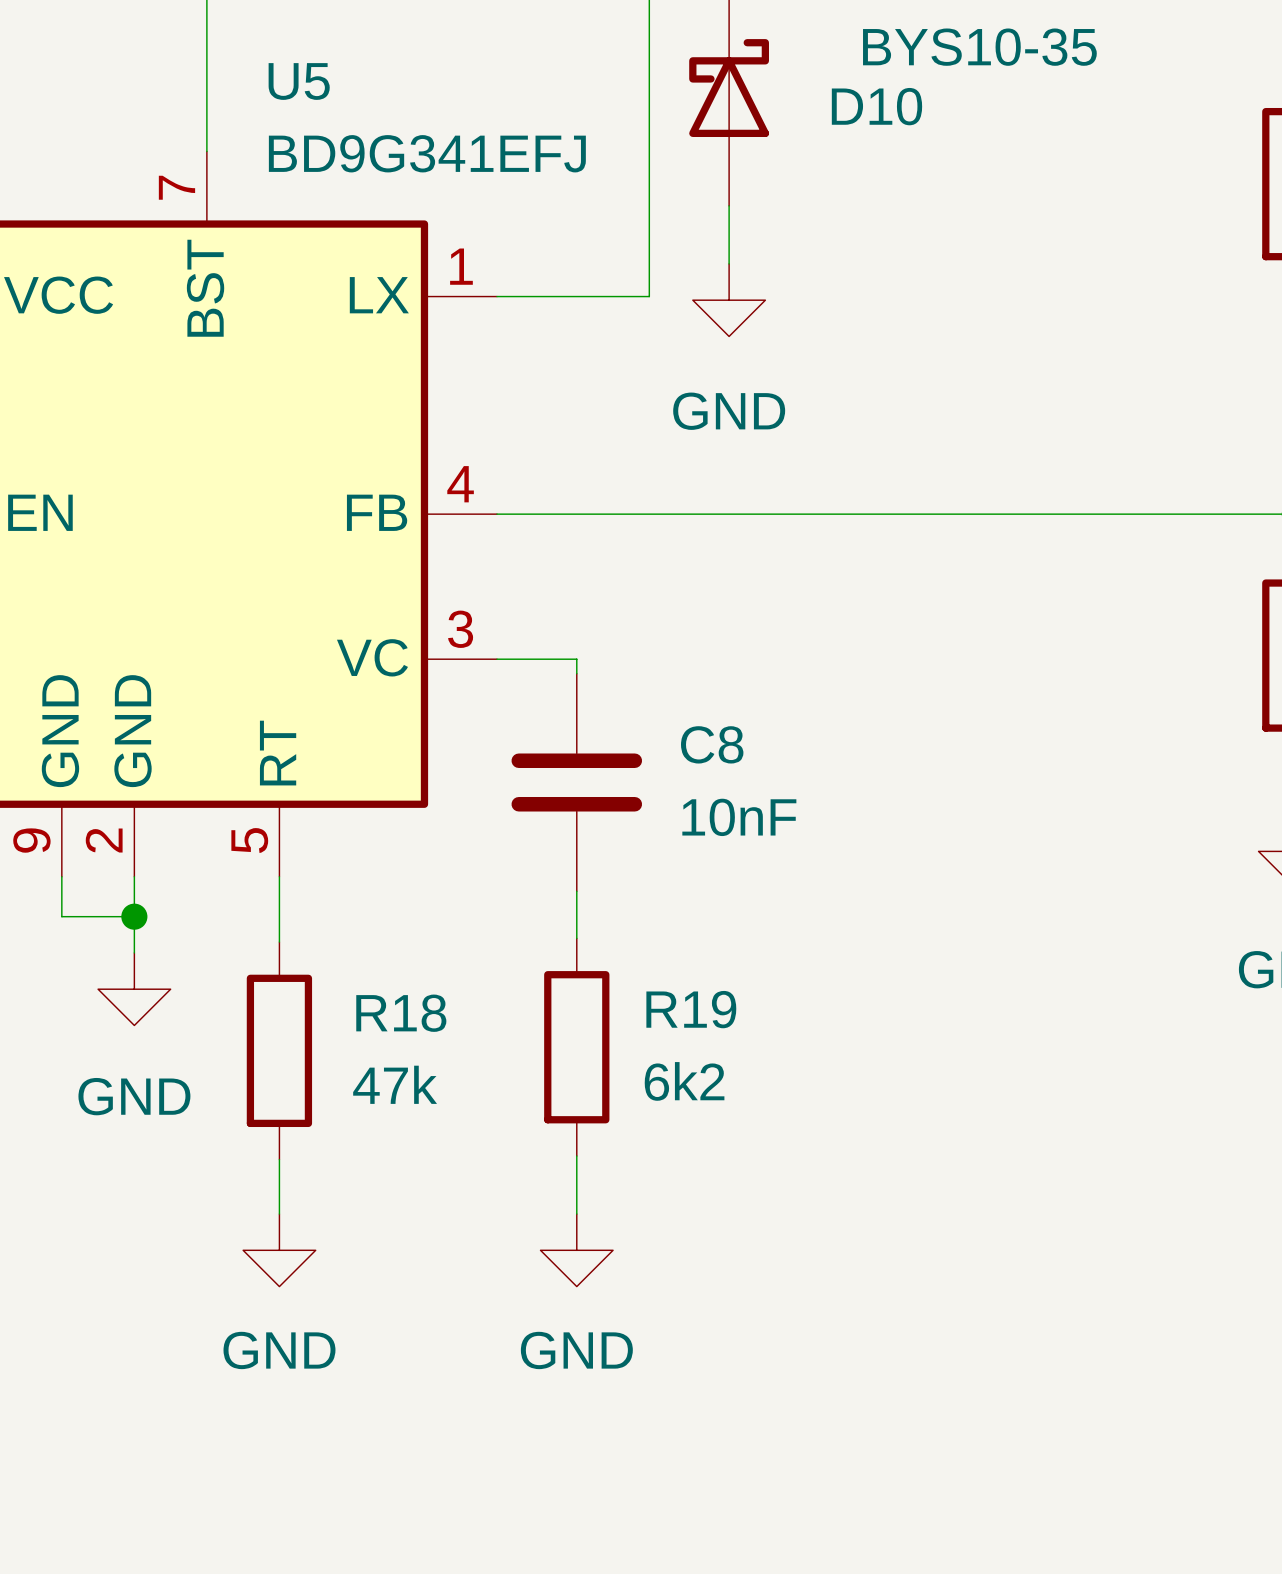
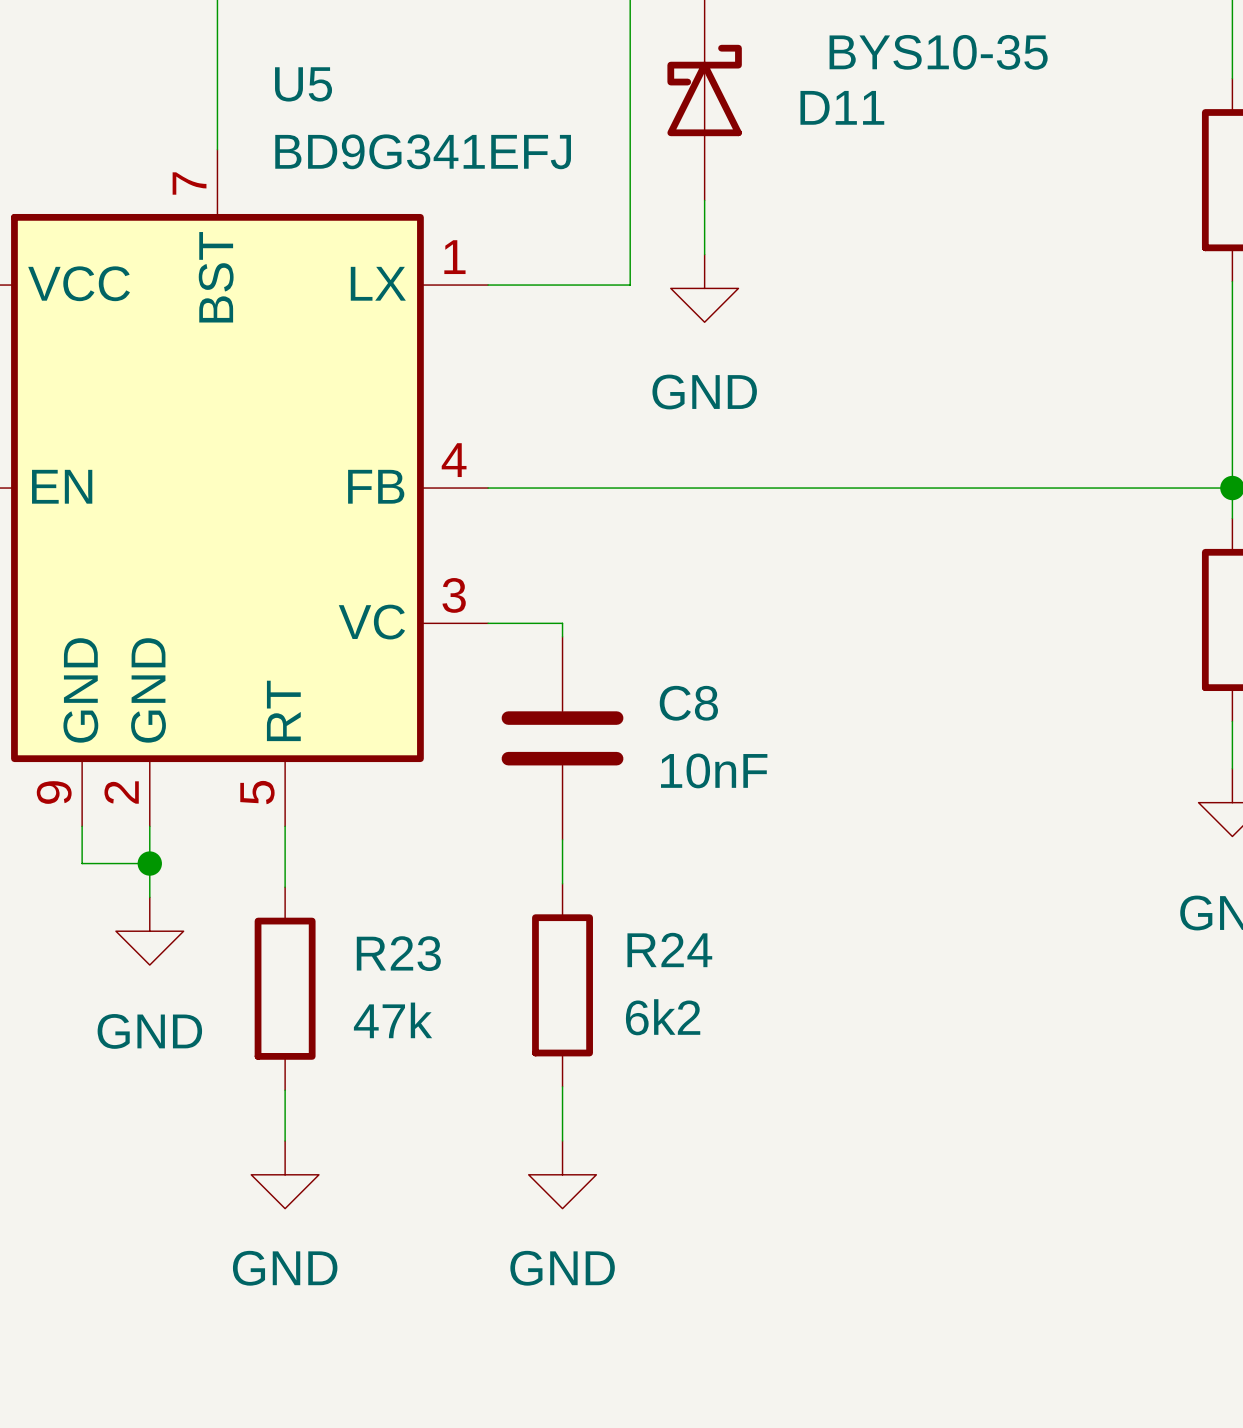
D10 name: D10 (876, 106) -> D11 (842, 107)
R19 name: R19 (691, 1009) -> R24 (669, 949)
R18 name: R18 (401, 1013) -> R23 (398, 953)

